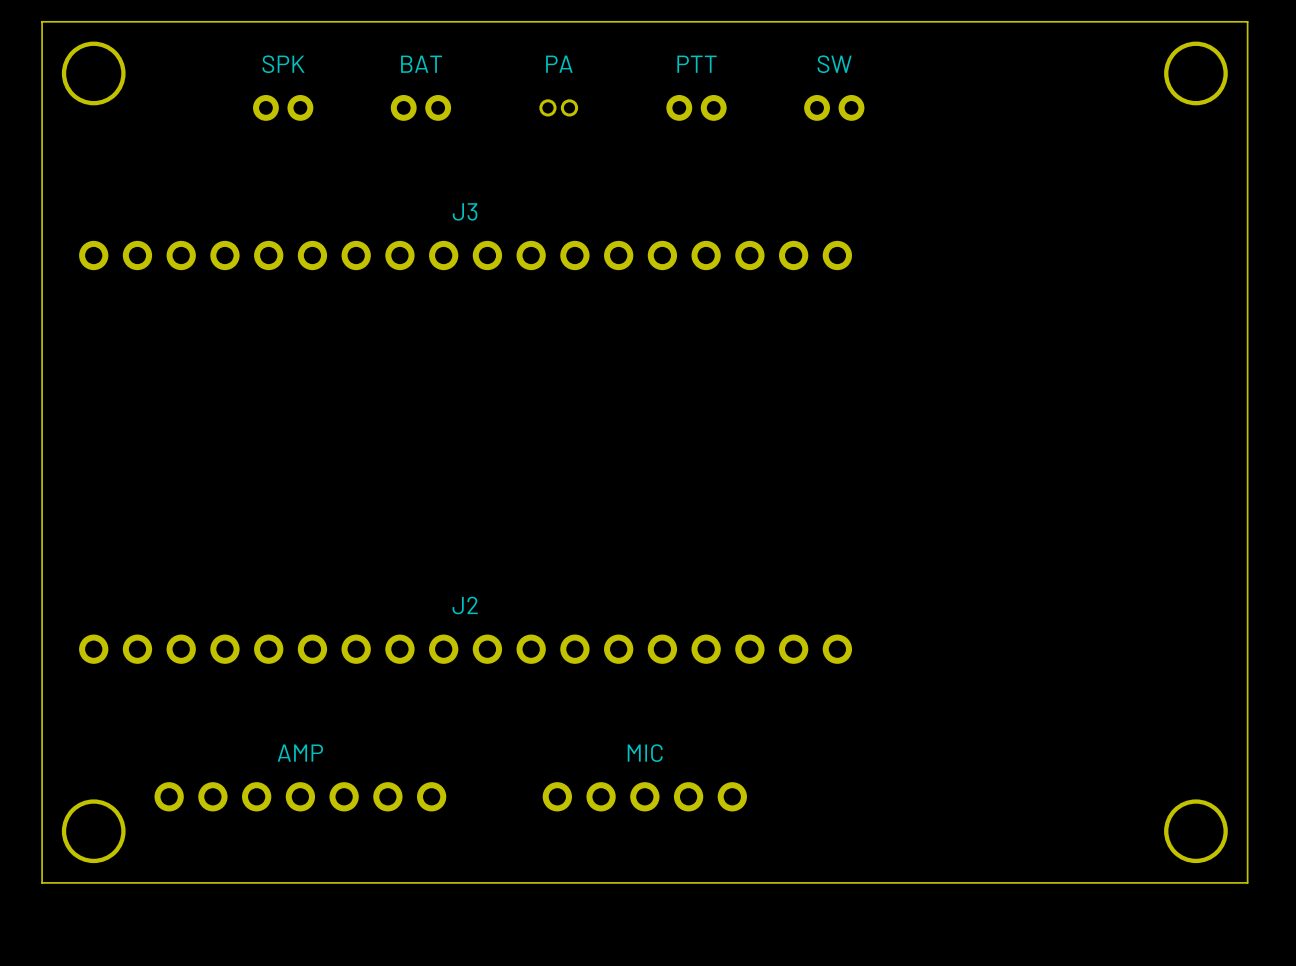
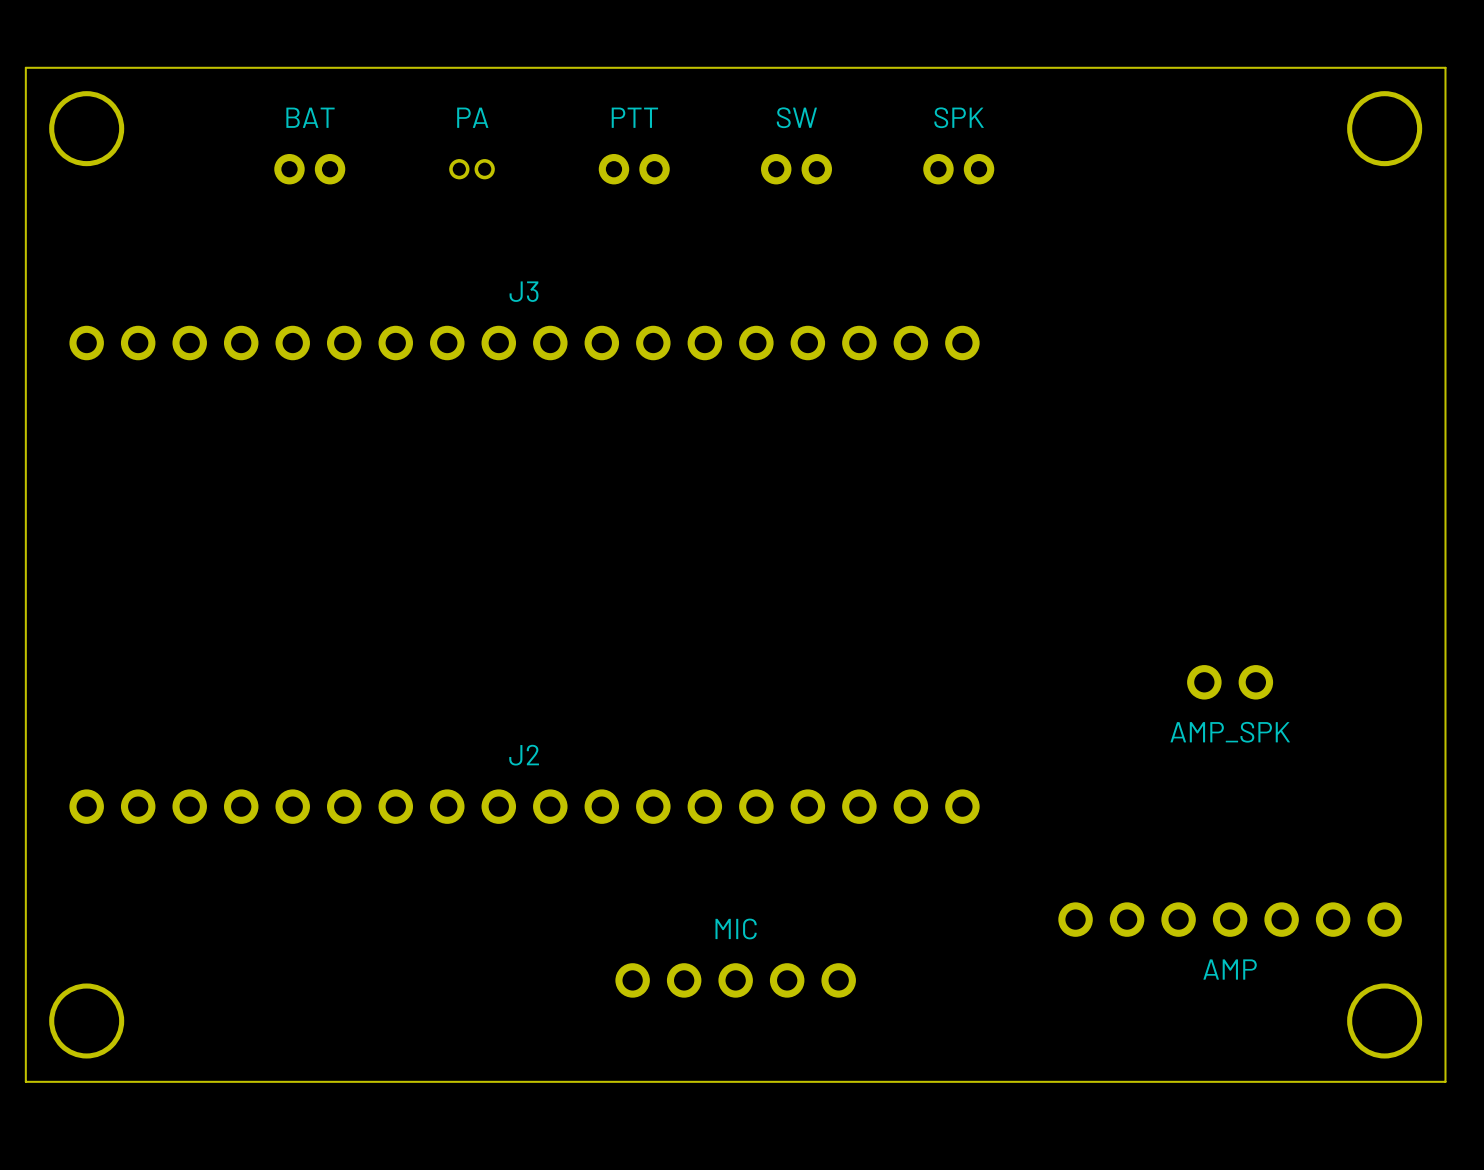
SPK name: SPK (283, 64) -> BAT (310, 117)
PTT name: PTT (697, 64) -> SW (796, 117)
SW name: SW (834, 64) -> SPK (959, 117)
BAT: (420, 107) -> none
PA position: (558, 107) -> (472, 169)
PTT: none -> (634, 169)
AMP_SPK: none -> (1230, 682)
AMP: none -> (1230, 919)
AMP: (300, 796) -> none

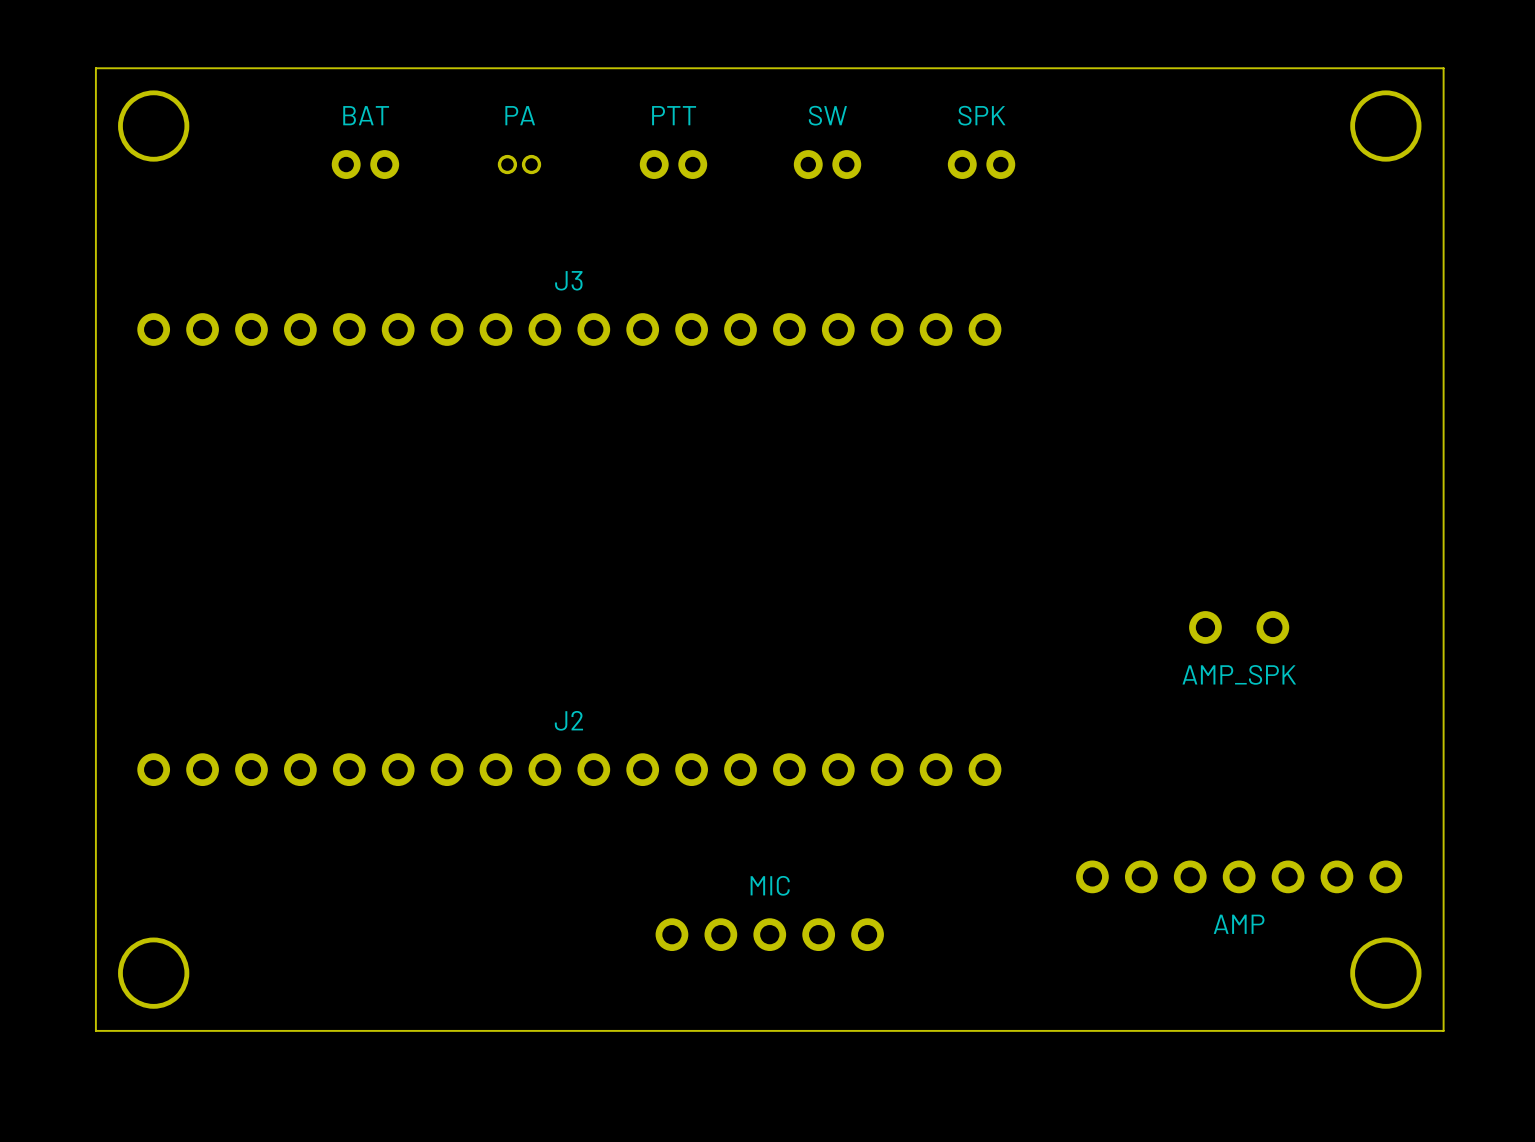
AMP_SPK: none -> (1239, 627)
AMP_SPK: (1230, 682) -> none

